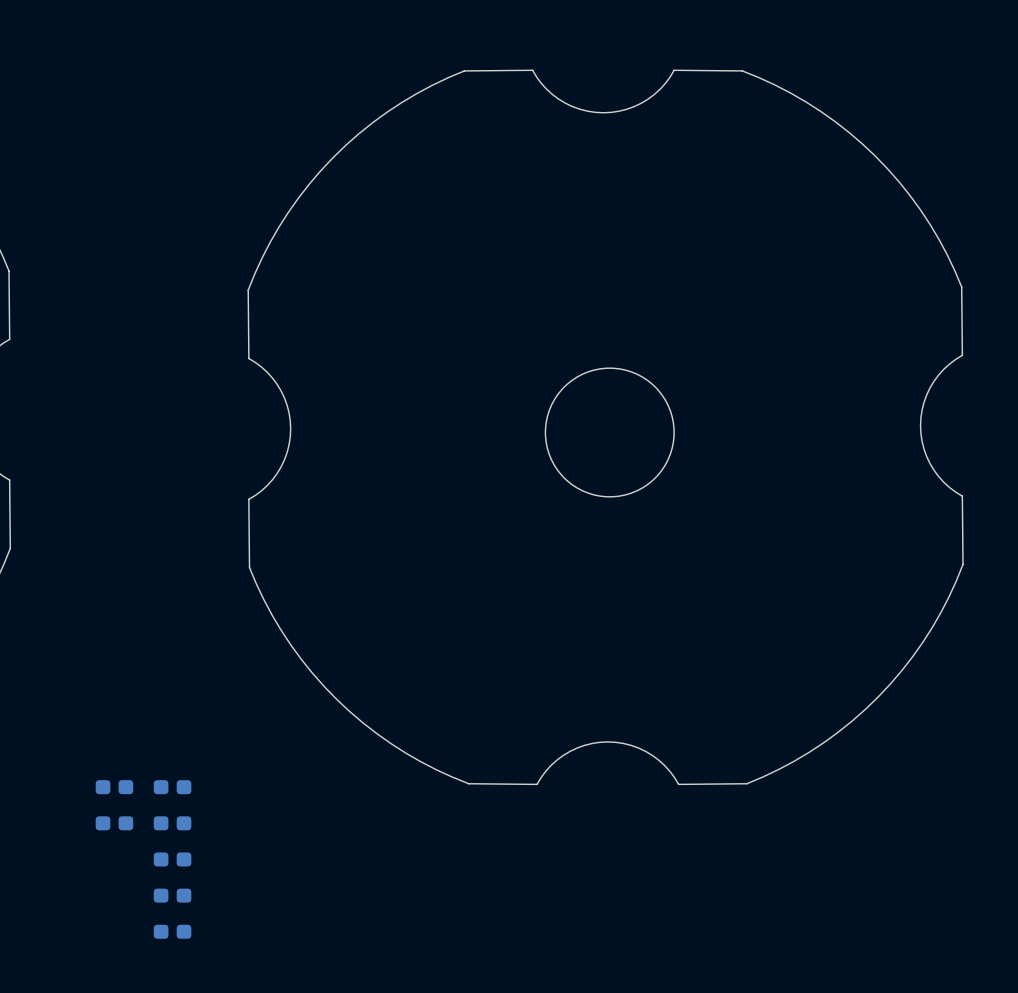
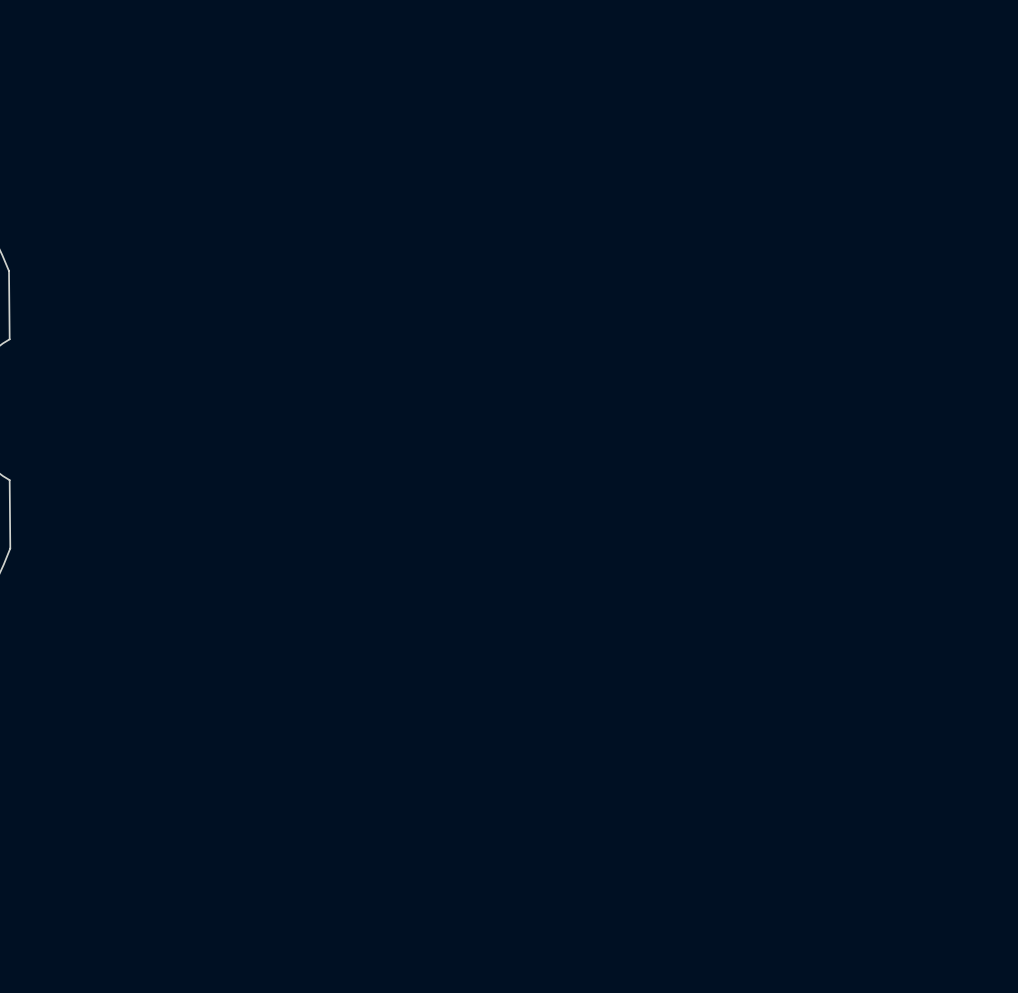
board edge: (532, 70) (464, 70) (432, 85) (401, 102) (358, 133) (333, 157) (298, 197) (270, 242) (248, 290) (248, 358) (267, 372) (281, 391) (289, 413) (290, 436) (284, 459) (277, 473) (261, 490) (248, 499) (249, 567) (263, 599) (281, 630) (301, 659) (324, 686) (362, 722) (390, 743) (420, 761) (452, 777) (468, 783) (537, 784) (545, 771) (563, 755) (584, 745) (607, 741) (631, 745) (645, 751) (664, 765) (678, 784) (746, 783) (778, 769) (809, 752) (838, 731) (865, 709) (901, 670) (922, 642) (940, 612) (956, 580) (963, 564) (962, 496) (943, 482) (929, 463) (923, 448) (920, 425) (923, 402) (929, 388) (943, 369) (962, 355) (961, 287) (947, 254) (929, 224) (909, 195) (887, 168) (862, 143) (834, 121) (805, 101) (774, 84) (742, 70) (674, 70) (660, 89) (641, 103) (619, 111) (595, 112) (572, 106) (558, 99) (541, 83) (536, 77) (532, 70) -> none
round board edge: [545, 367, 675, 498] -> none
part: (114, 787) -> none
part: (172, 787) -> none
part: (114, 823) -> none
part: (172, 823) -> none
part: (172, 859) -> none
part: (172, 895) -> none
part: (172, 931) -> none

